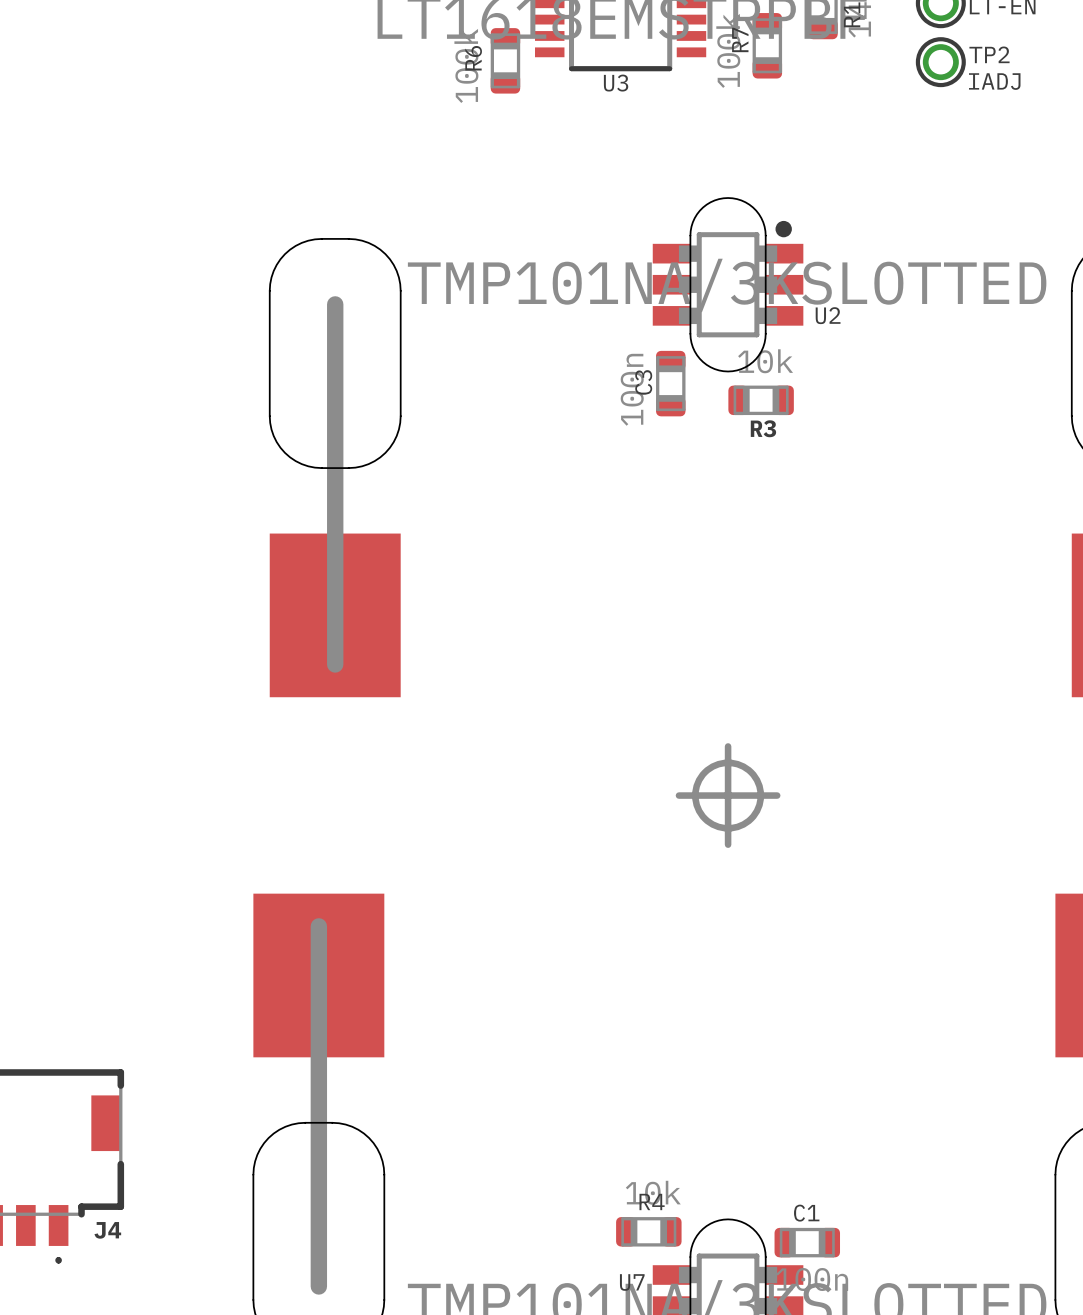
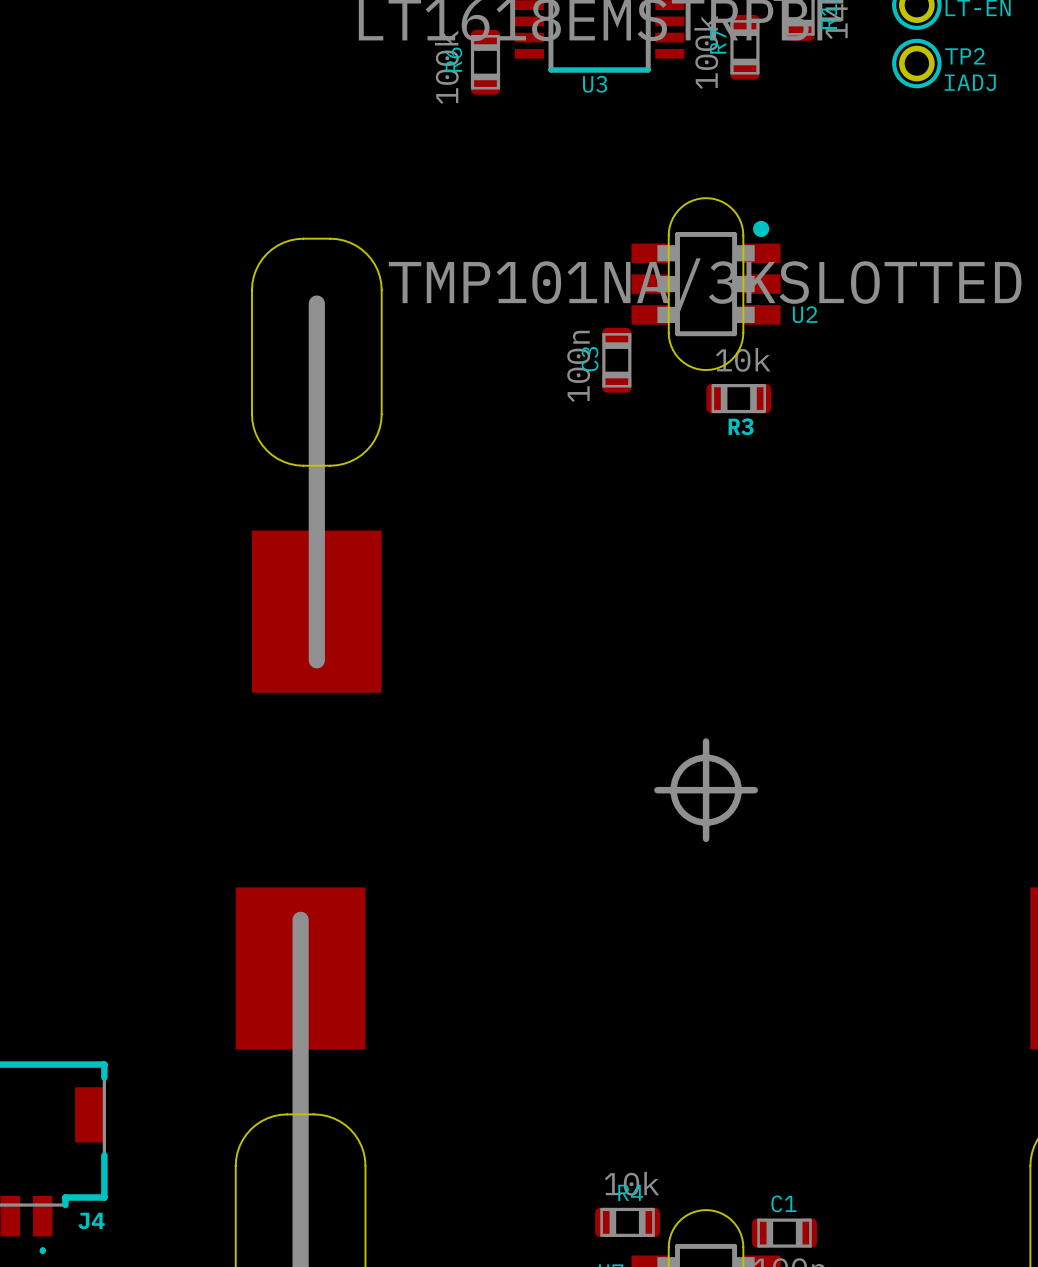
C3 position: (670, 383) -> (616, 360)

